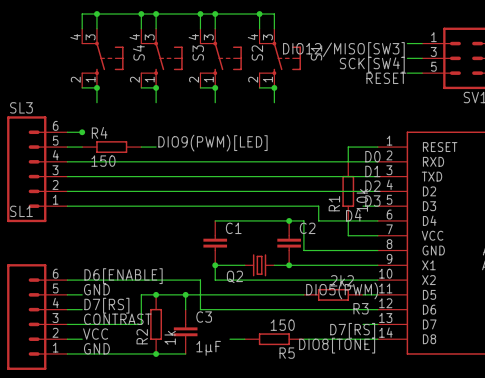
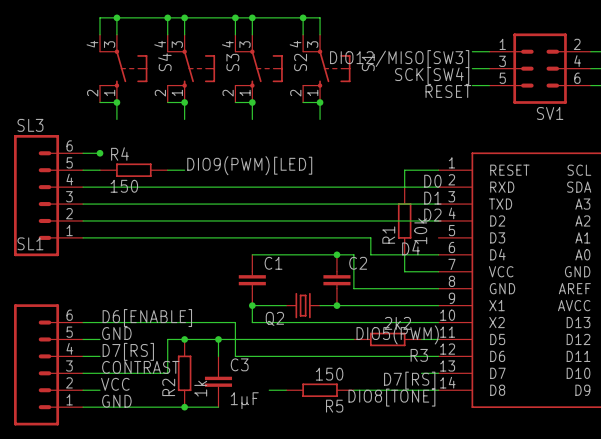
label: D3 (372, 201) -> none
wire: (363, 206) (377, 206) -> none

